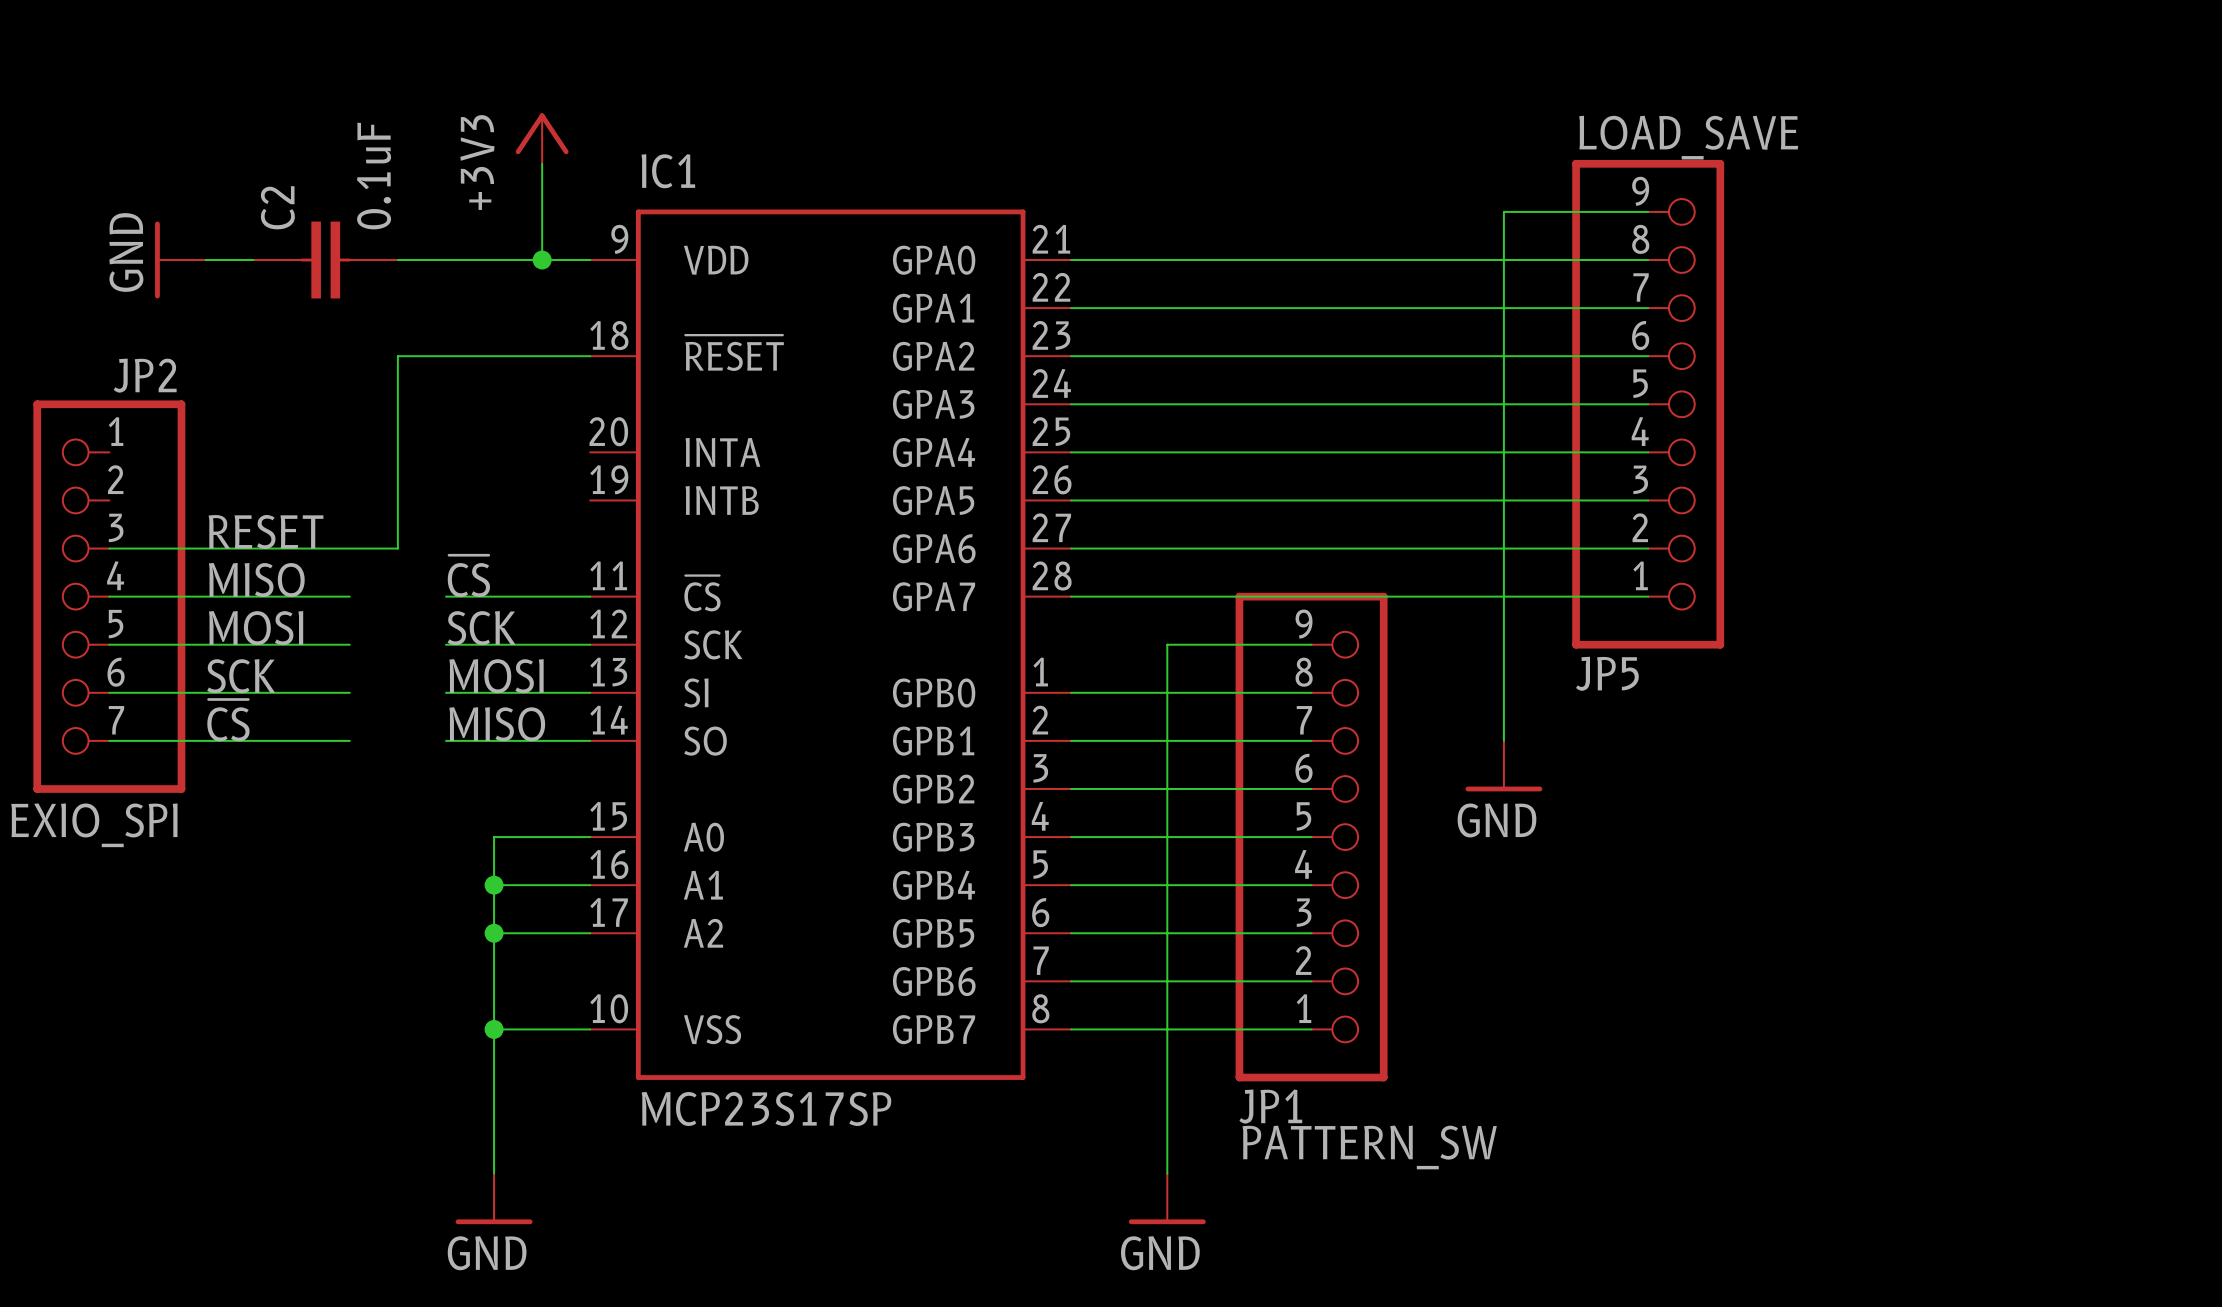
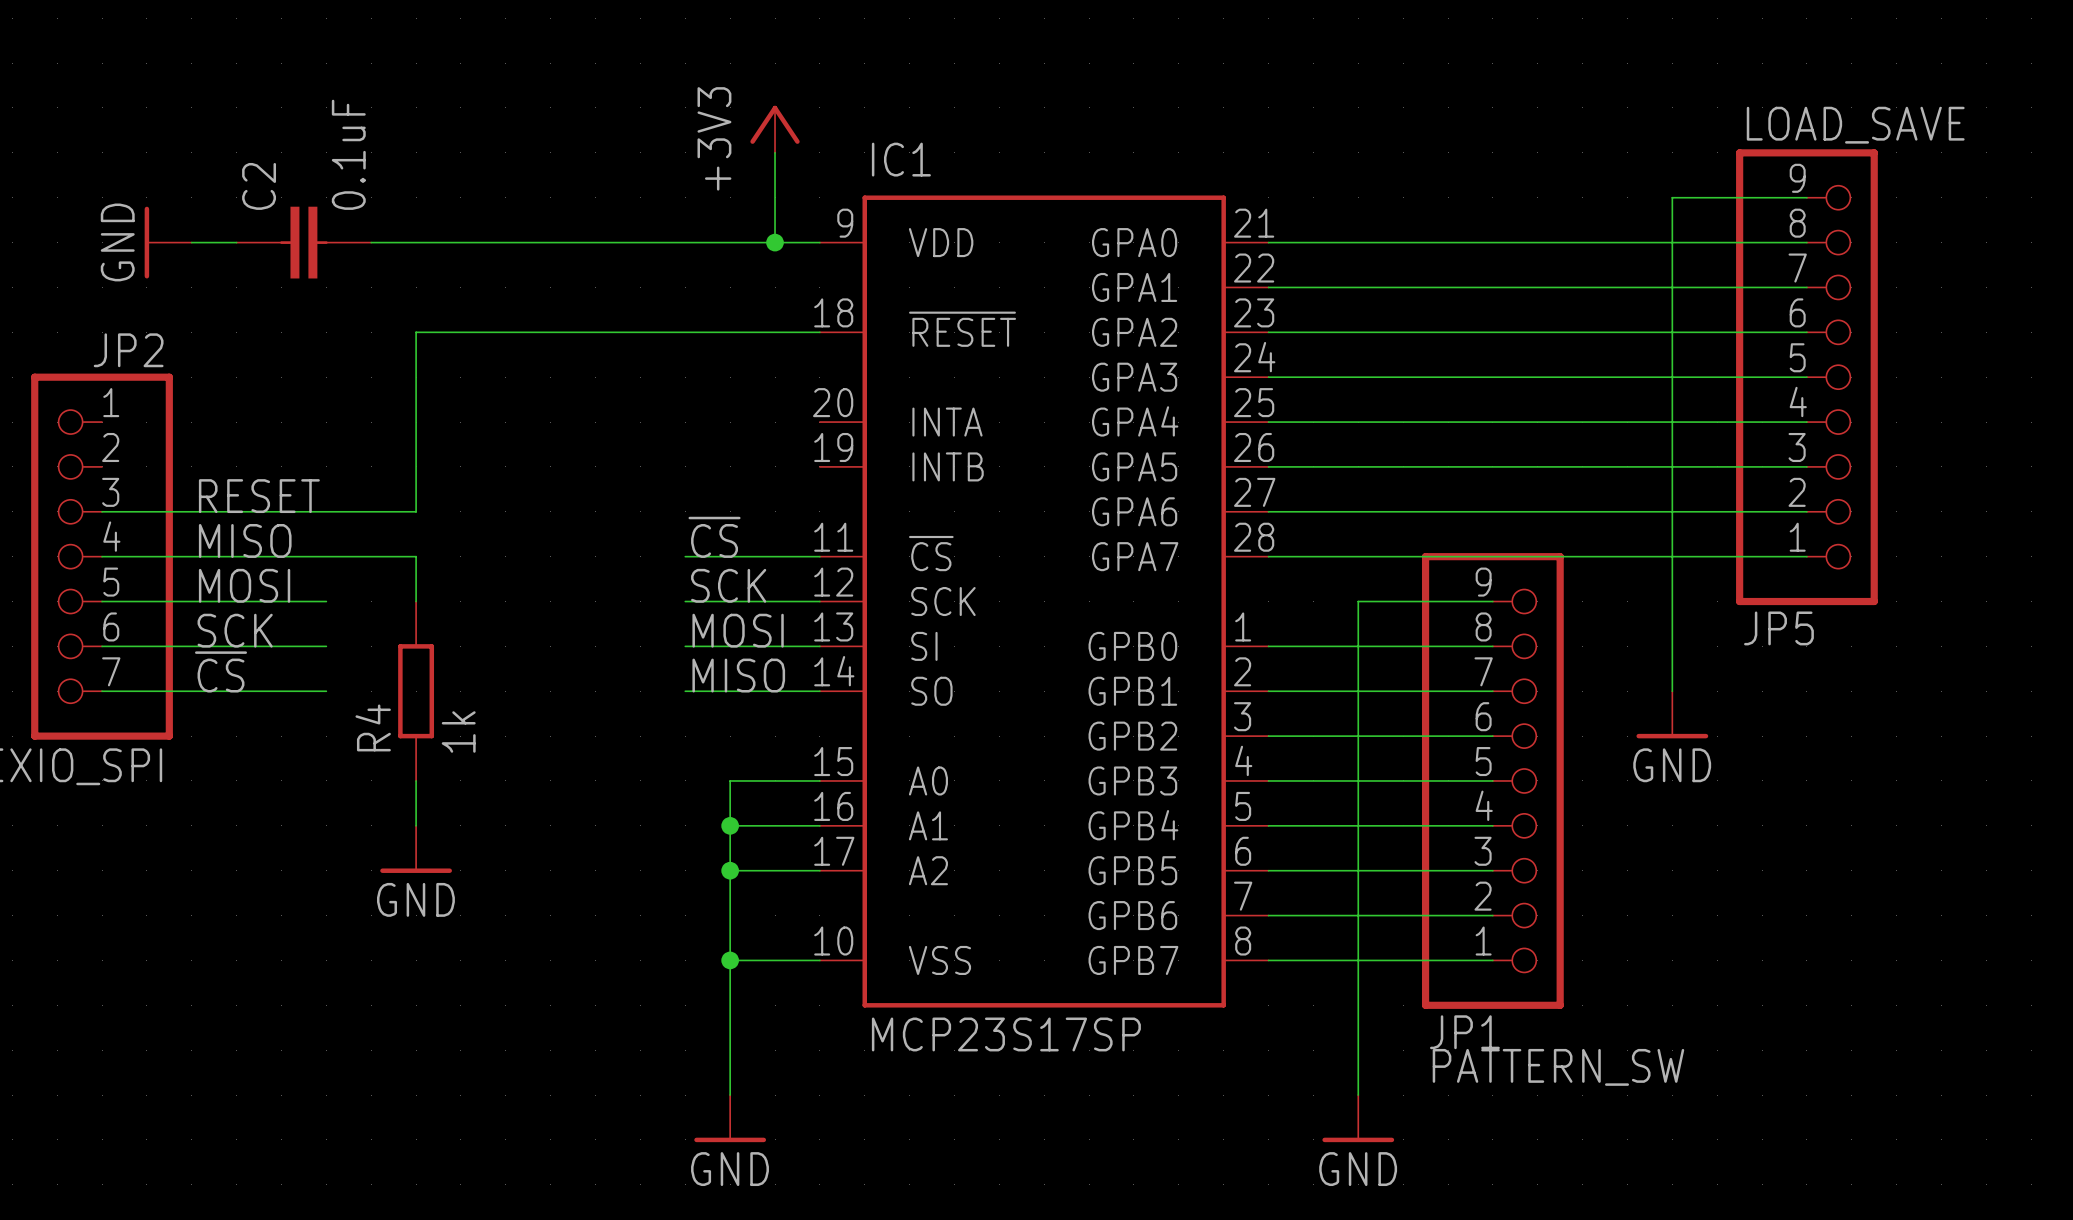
power symbol position: +3V3 (542, 138) -> +3V3 (775, 129)
wire: (542, 163) (542, 260) -> (775, 152) (775, 242)
wire: (1648, 211) (1503, 211) (1503, 740) -> (1806, 197) (1672, 197) (1672, 691)
junction: (542, 260) -> none
wire: none -> (550, 242) (819, 242)
junction: none -> (775, 242)
wire: (1071, 260) (1359, 260) -> none
wire: none -> (1537, 242) (1806, 242)
wire: (1071, 308) (1359, 308) -> none
wire: none -> (1537, 287) (1806, 287)
wire: (445, 356) (397, 356) (397, 548) -> (416, 332) (416, 511) (371, 511)
wire: none -> (550, 332) (819, 332)
wire: (1071, 356) (1359, 356) -> none
wire: none -> (1537, 332) (1806, 332)
wire: (1071, 404) (1359, 404) -> none
wire: none -> (1537, 377) (1806, 377)
JP5 position: (1648, 404) -> (1806, 377)
wire: (1071, 452) (1359, 452) -> none
wire: none -> (1537, 422) (1806, 422)
wire: (1071, 500) (1359, 500) -> none
wire: none -> (1537, 466) (1806, 466)
wire: (1071, 548) (1359, 548) -> none
wire: none -> (1537, 511) (1806, 511)
label position: ~{CS} (468, 576) -> ~{CS} (714, 537)
wire: (445, 596) (590, 596) -> (685, 556) (819, 556)
wire: (1071, 596) (1359, 596) -> none
wire: none -> (1537, 556) (1806, 556)
label position: SCK (481, 628) -> SCK (728, 585)
wire: (445, 644) (590, 644) -> (416, 601) (416, 556) (326, 556)
wire: none -> (685, 601) (819, 601)
IC1 position: (830, 644) -> (1044, 601)
wire: (1311, 644) (1167, 644) (1167, 1173) -> (1492, 601) (1358, 601) (1358, 1095)
label position: MOSI (496, 676) -> MOSI (738, 630)
wire: (445, 692) (590, 692) -> (685, 646) (819, 646)
wire: (1071, 692) (1311, 692) -> (1268, 646) (1492, 646)
label position: MISO (497, 724) -> MISO (738, 675)
wire: (445, 740) (590, 740) -> (685, 691) (819, 691)
R4: none -> 1k (416, 691)
wire: (1071, 740) (1311, 740) -> (1268, 691) (1492, 691)
power symbol: GND (1503, 766) -> none
power symbol: none -> GND (1672, 714)
wire: (1071, 788) (1311, 788) -> (1268, 736) (1492, 736)
wire: none -> (416, 780) (416, 825)
wire: (590, 837) (494, 837) (494, 1173) -> (819, 780) (730, 780) (730, 1095)
wire: (1071, 837) (1311, 837) -> (1268, 780) (1492, 780)
JP1 position: (1311, 837) -> (1492, 780)
wire: (494, 885) (590, 885) -> (730, 825) (819, 825)
junction: (494, 885) -> none
junction: none -> (730, 825)
wire: (1071, 885) (1311, 885) -> (1268, 825) (1492, 825)
power symbol: none -> GND (416, 849)
wire: (494, 933) (590, 933) -> (730, 870) (819, 870)
junction: (494, 933) -> none
junction: none -> (730, 870)
wire: (1071, 933) (1311, 933) -> (1268, 870) (1492, 870)
wire: (1071, 981) (1311, 981) -> (1268, 915) (1492, 915)
wire: (494, 1029) (590, 1029) -> (730, 960) (819, 960)
junction: (494, 1029) -> none
junction: none -> (730, 960)
wire: (1071, 1029) (1311, 1029) -> (1268, 960) (1492, 960)
power symbol: GND (494, 1198) -> none
power symbol: none -> GND (730, 1118)
power symbol: GND (1167, 1198) -> none
power symbol: none -> GND (1358, 1118)

